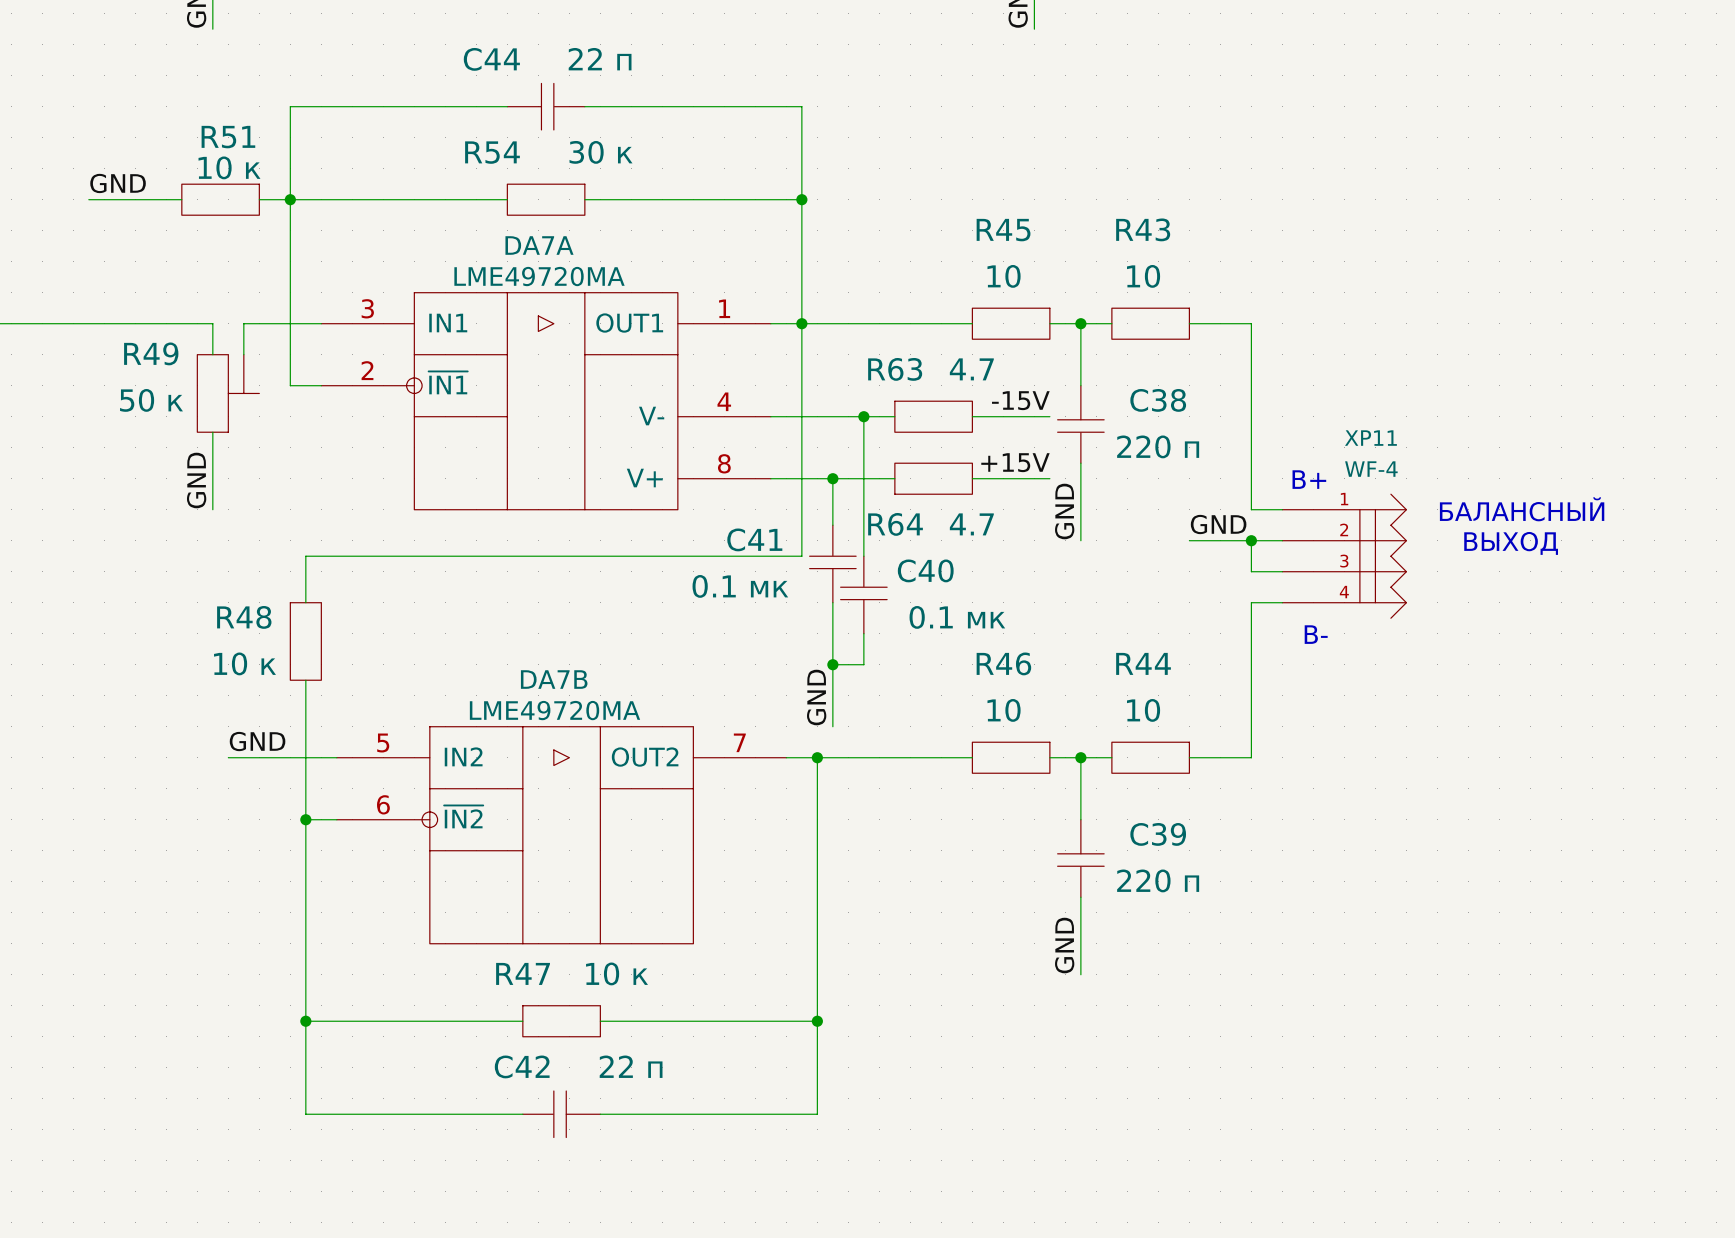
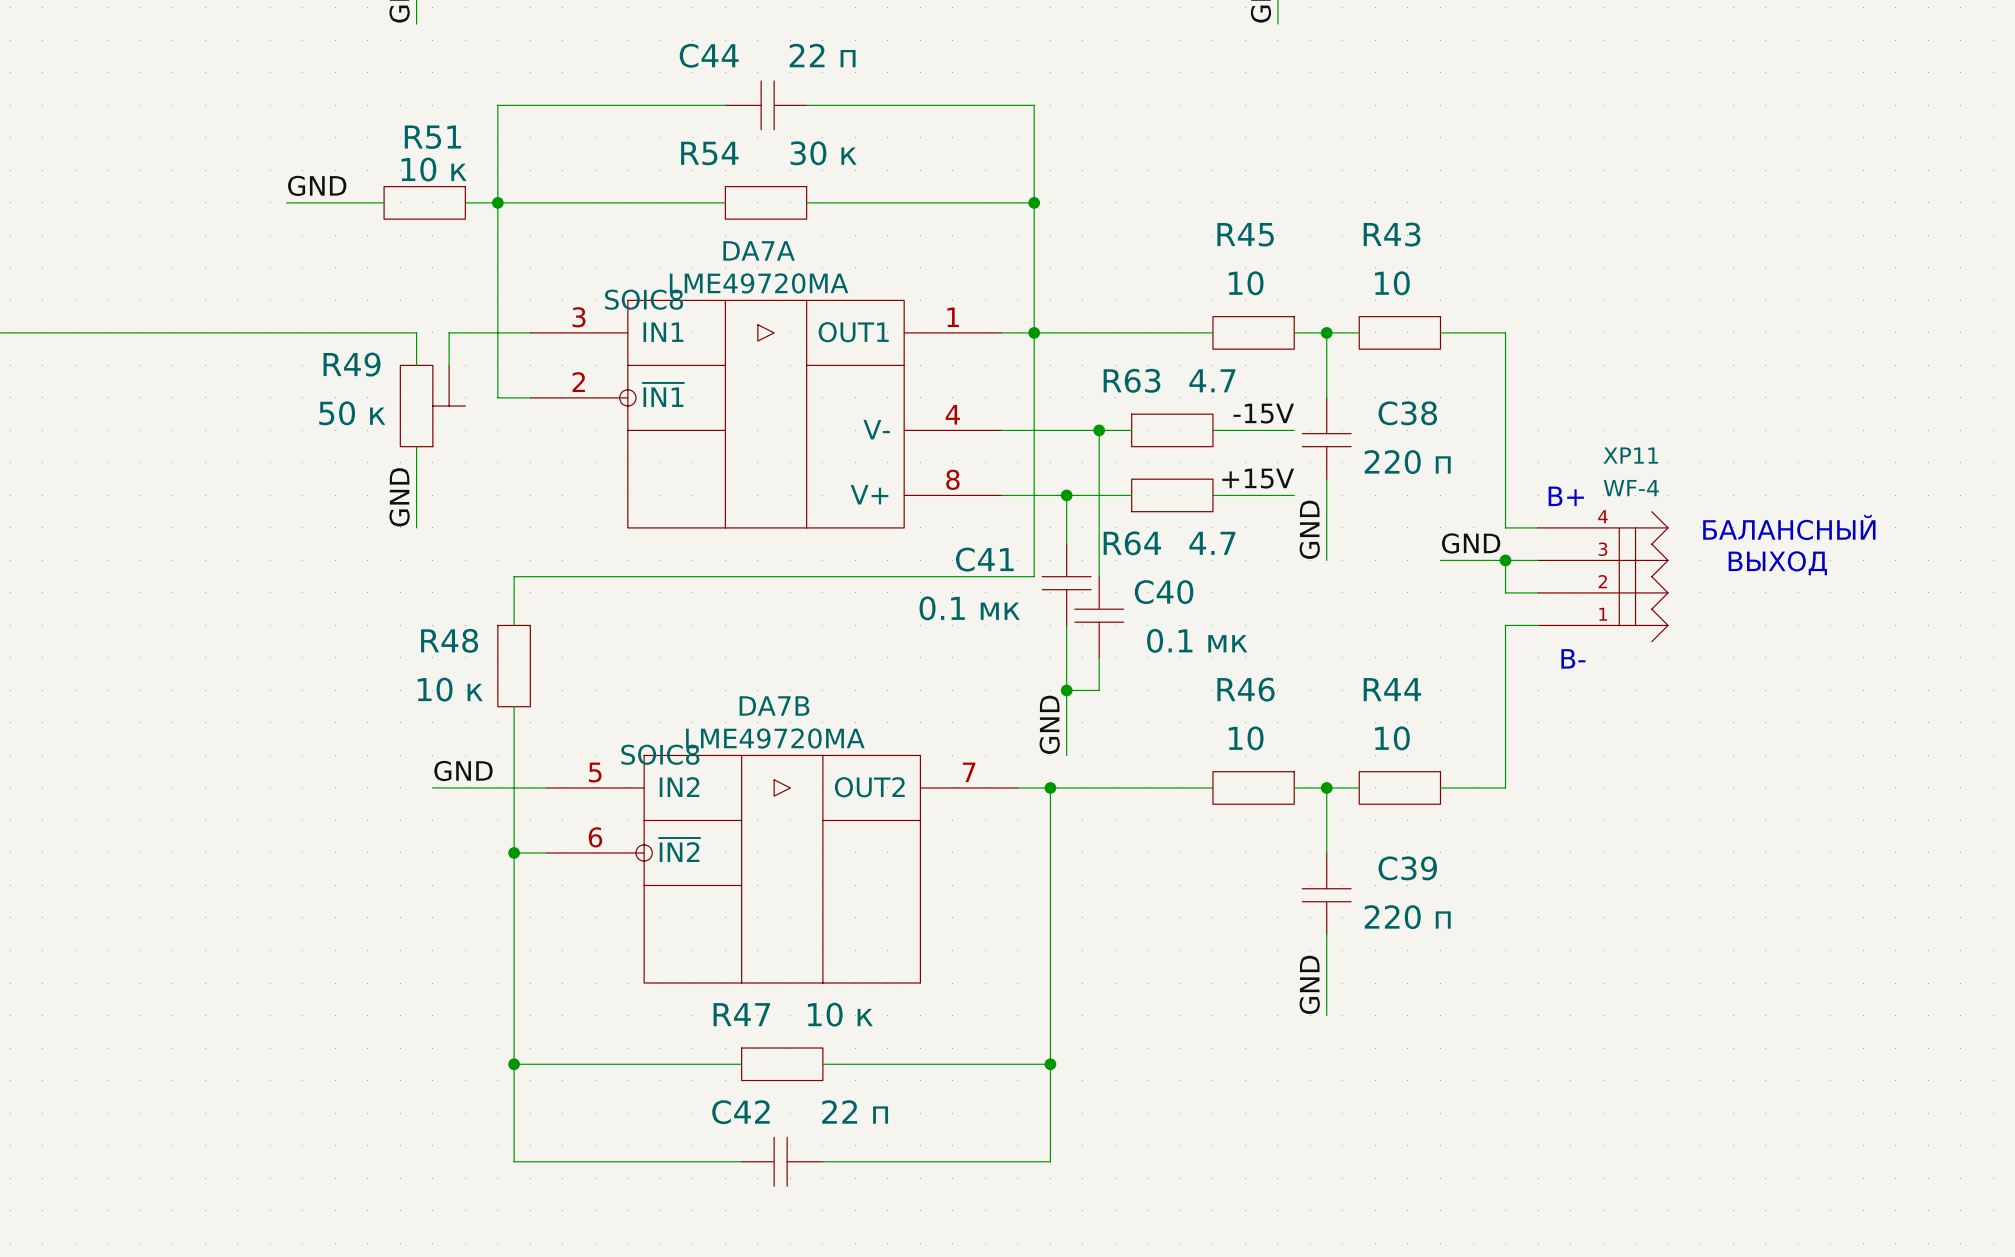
DA7A text: none -> SOIC8 (644, 299)
XP11 flip: as is (1383, 556) -> up-down (1643, 576)
DA7B text: none -> SOIC8 (660, 754)

